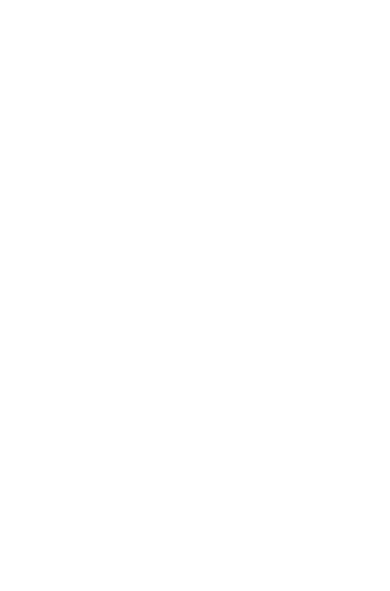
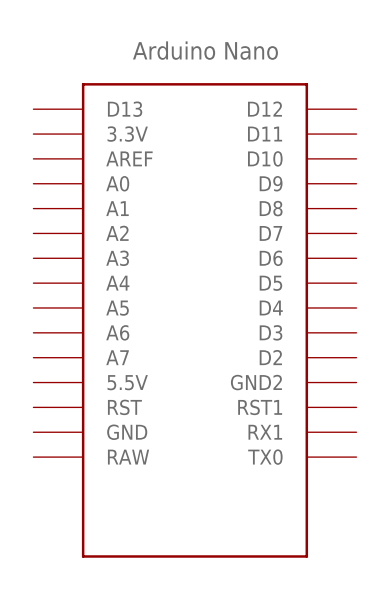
part: none -> (194, 320)

